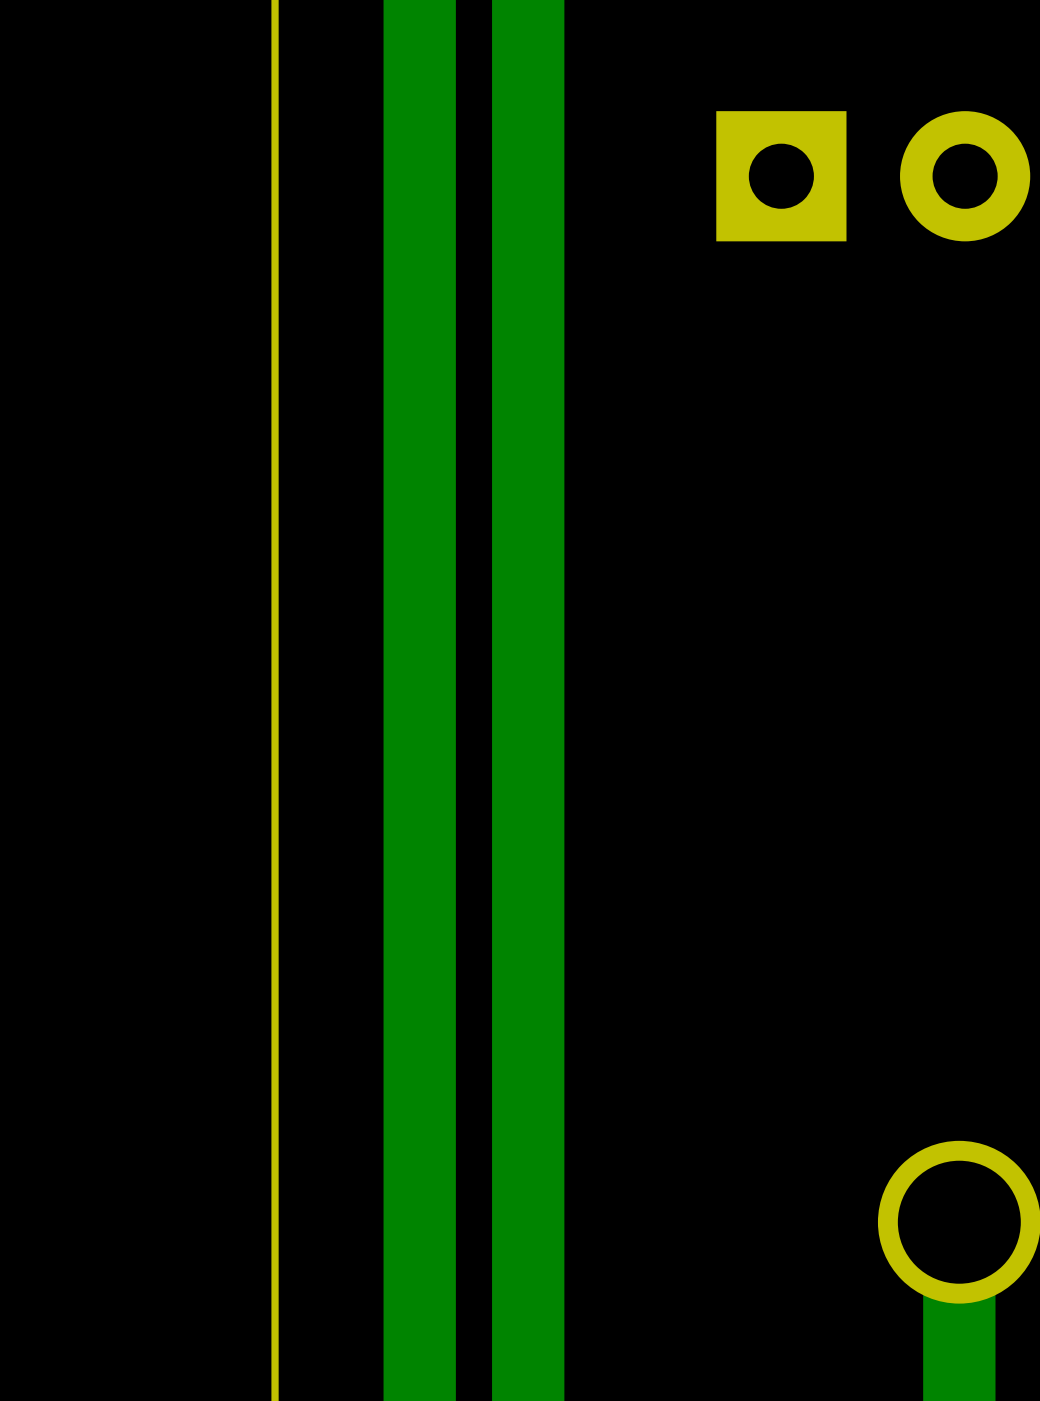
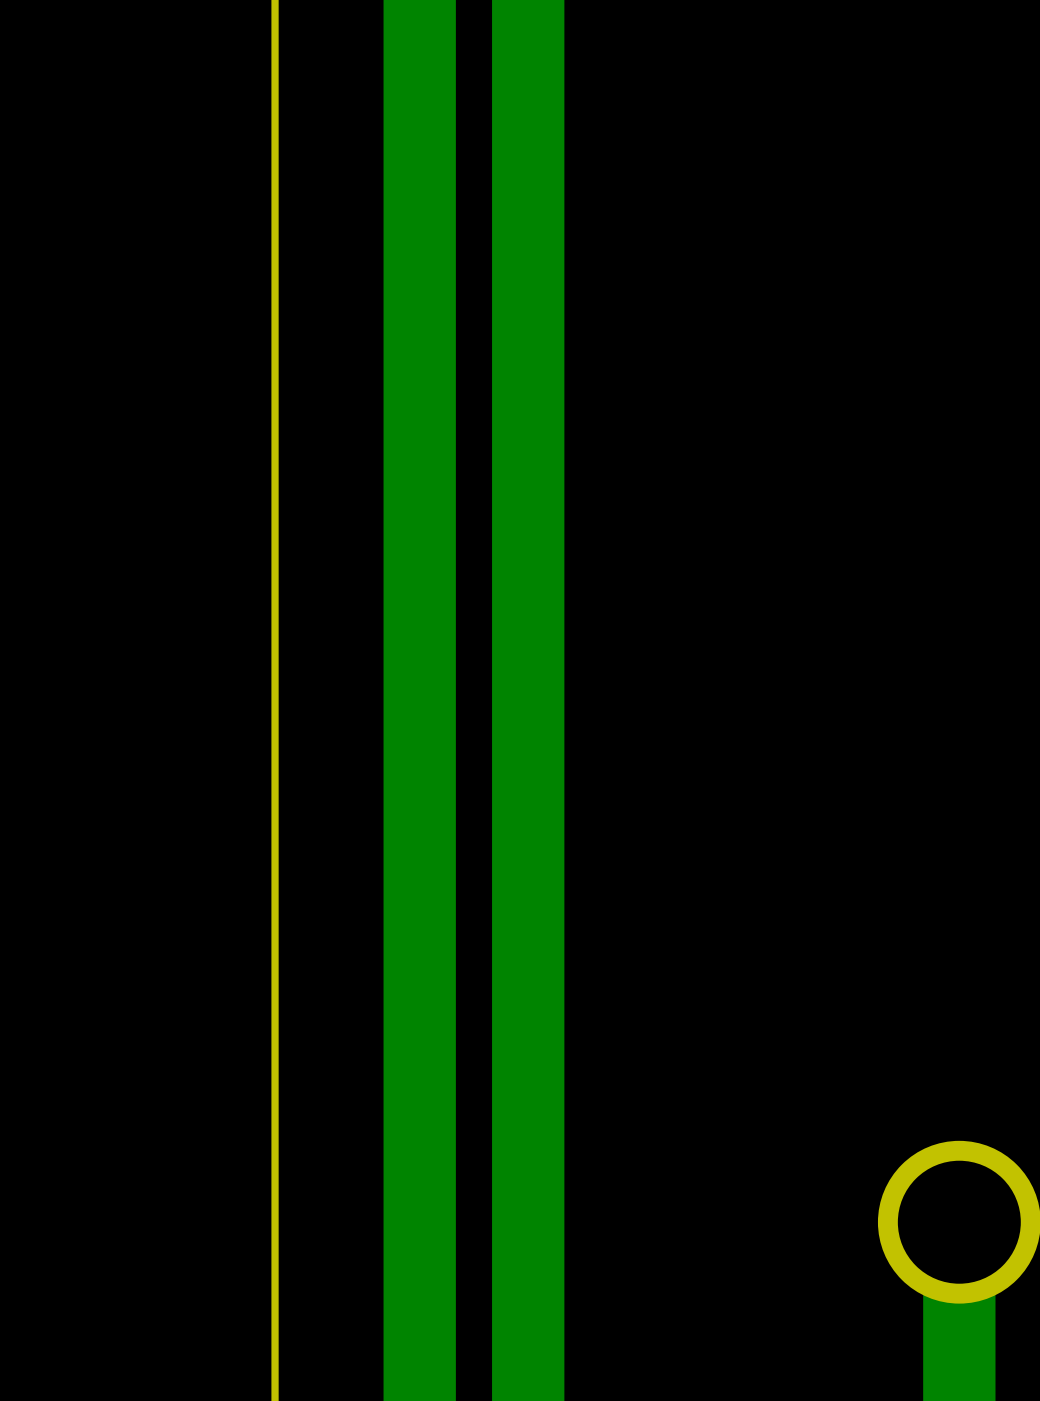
part: (873, 176) -> none

